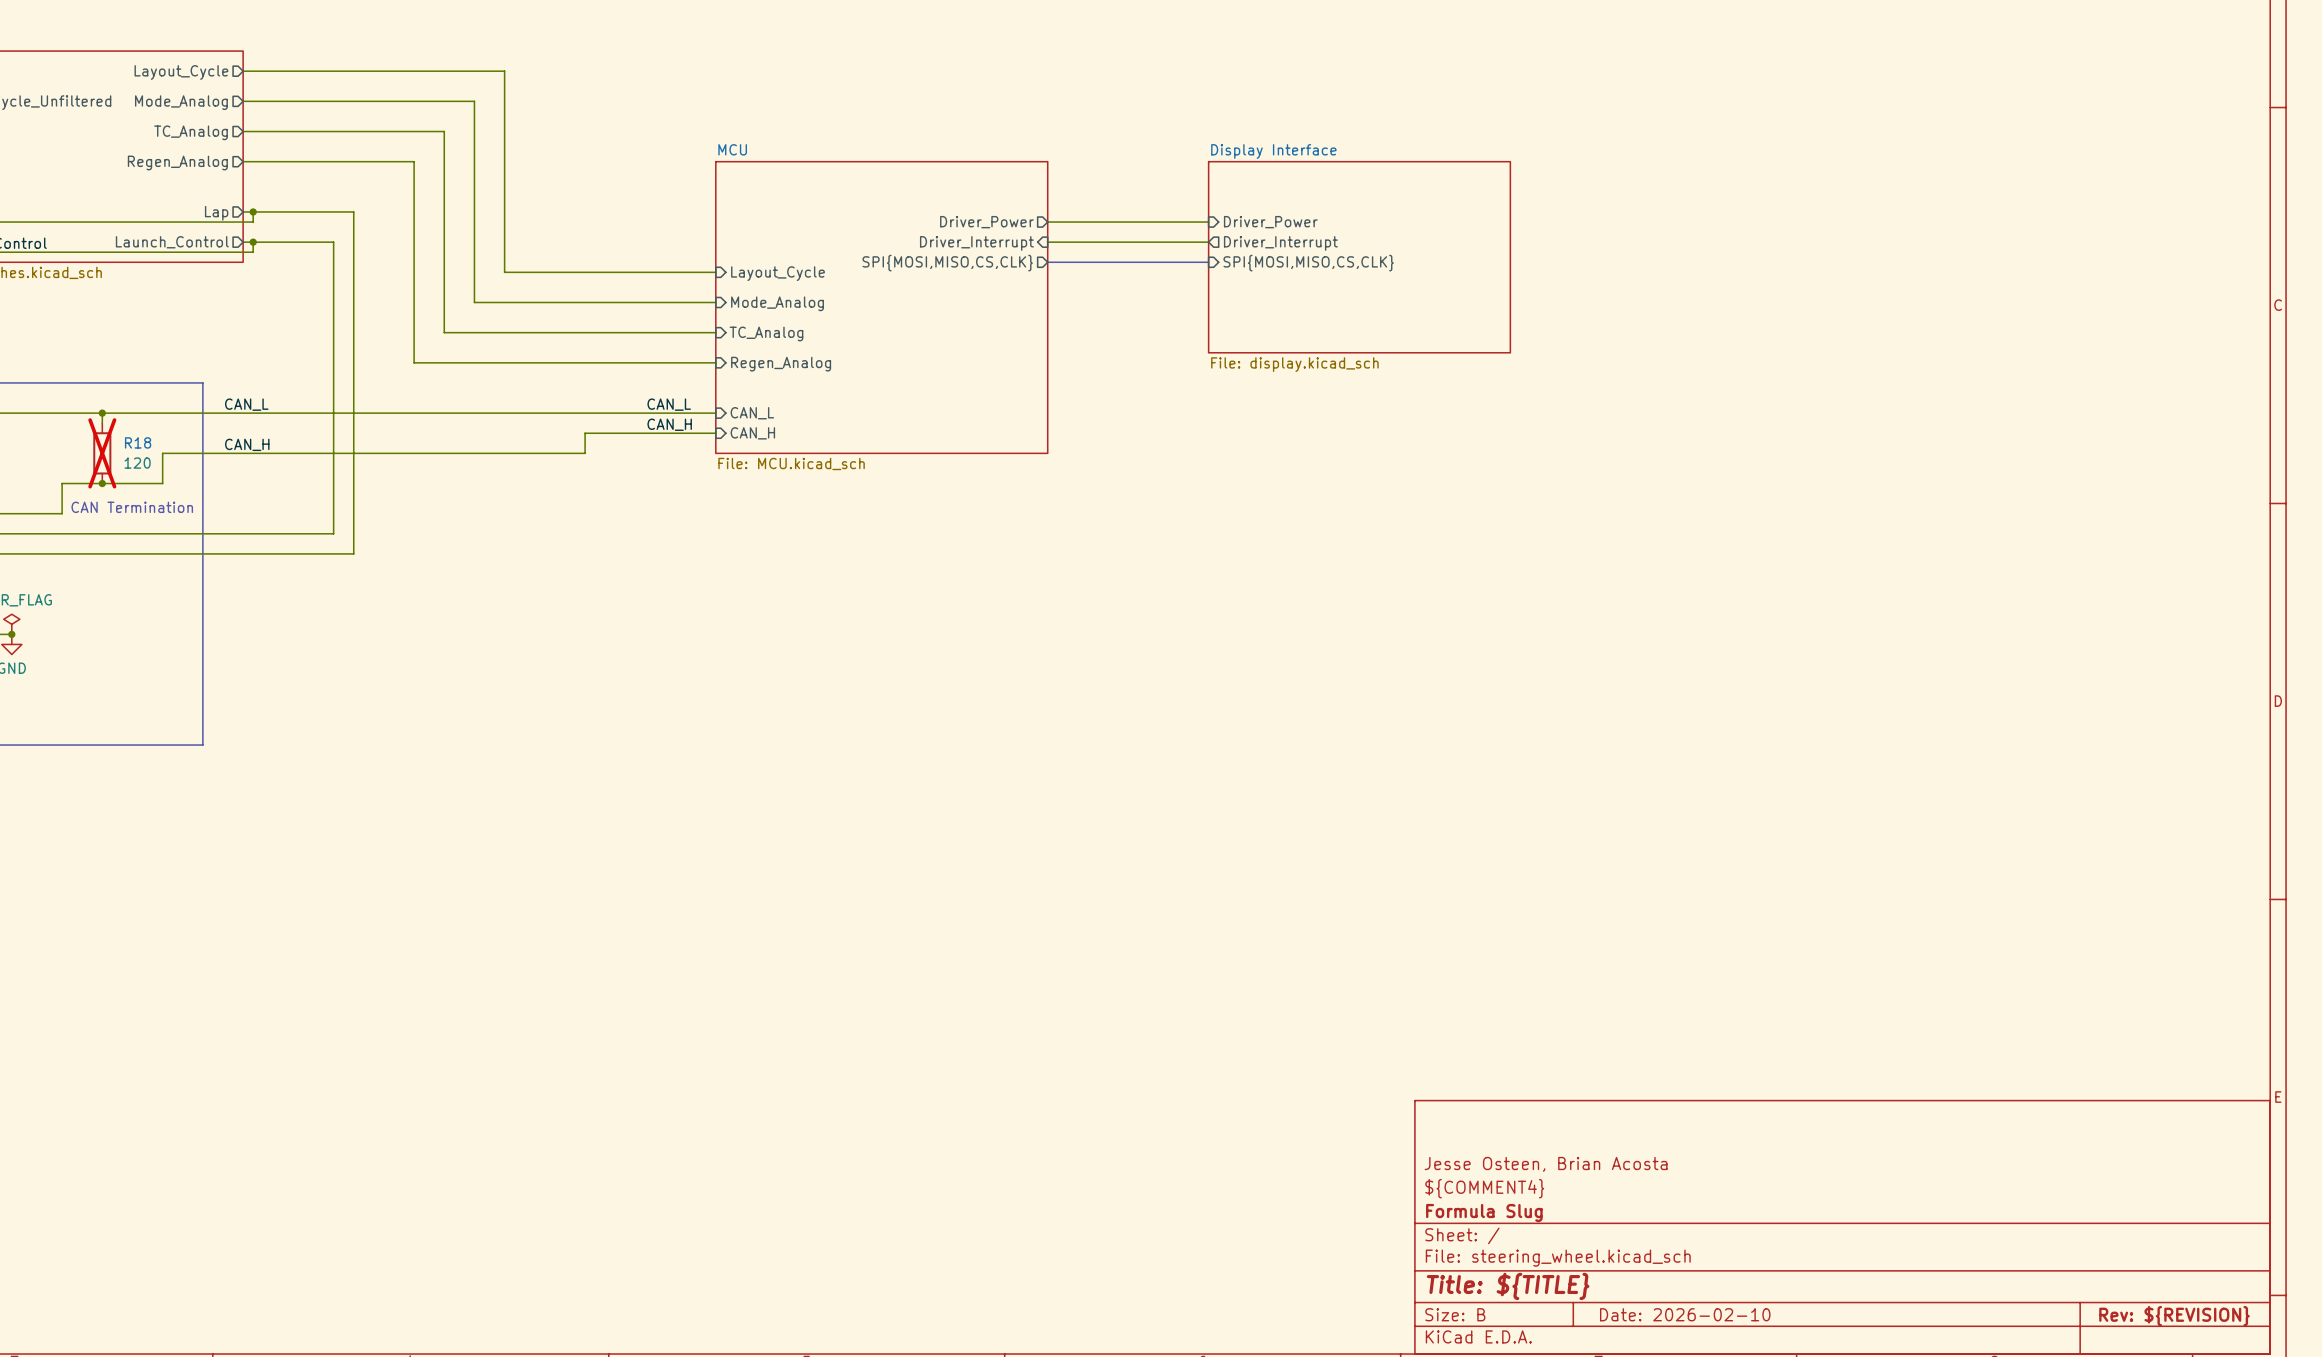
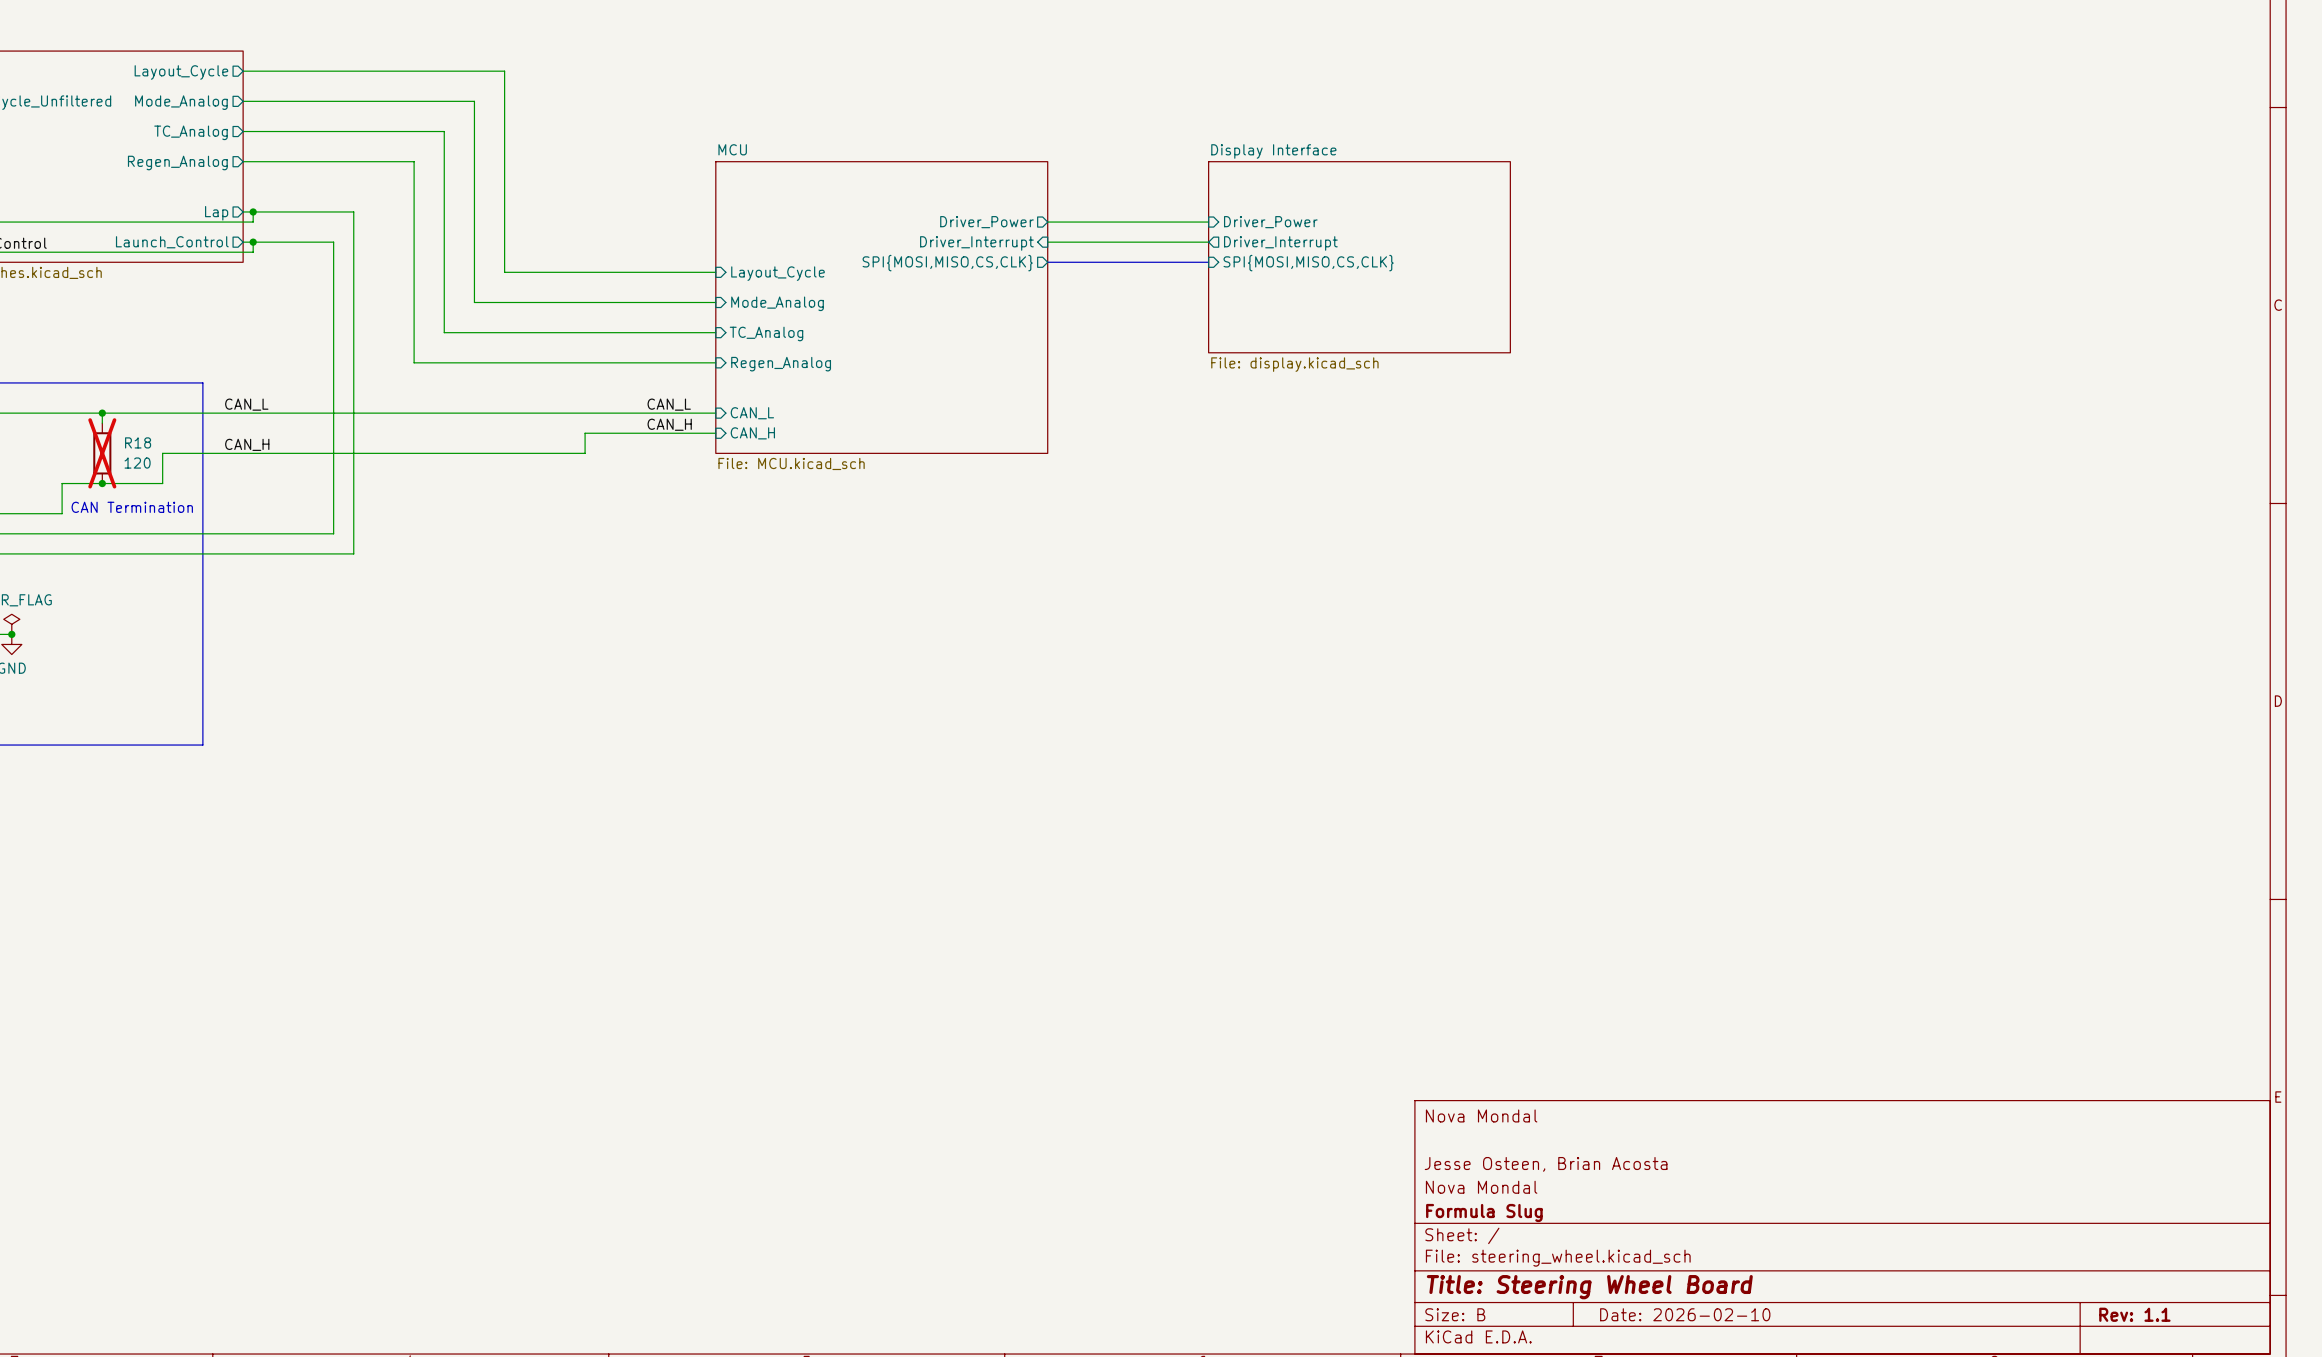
title block: none -> Nova Mondal (1481, 1115)
title block: ${COMMENT4} (1484, 1188) -> Nova Mondal (1481, 1187)
title block: Title: ${TITLE} (1508, 1286) -> Title: Steering Wheel Board (1589, 1287)
title block: Rev: ${REVISION} (2174, 1316) -> Rev: 1.1 (2134, 1314)

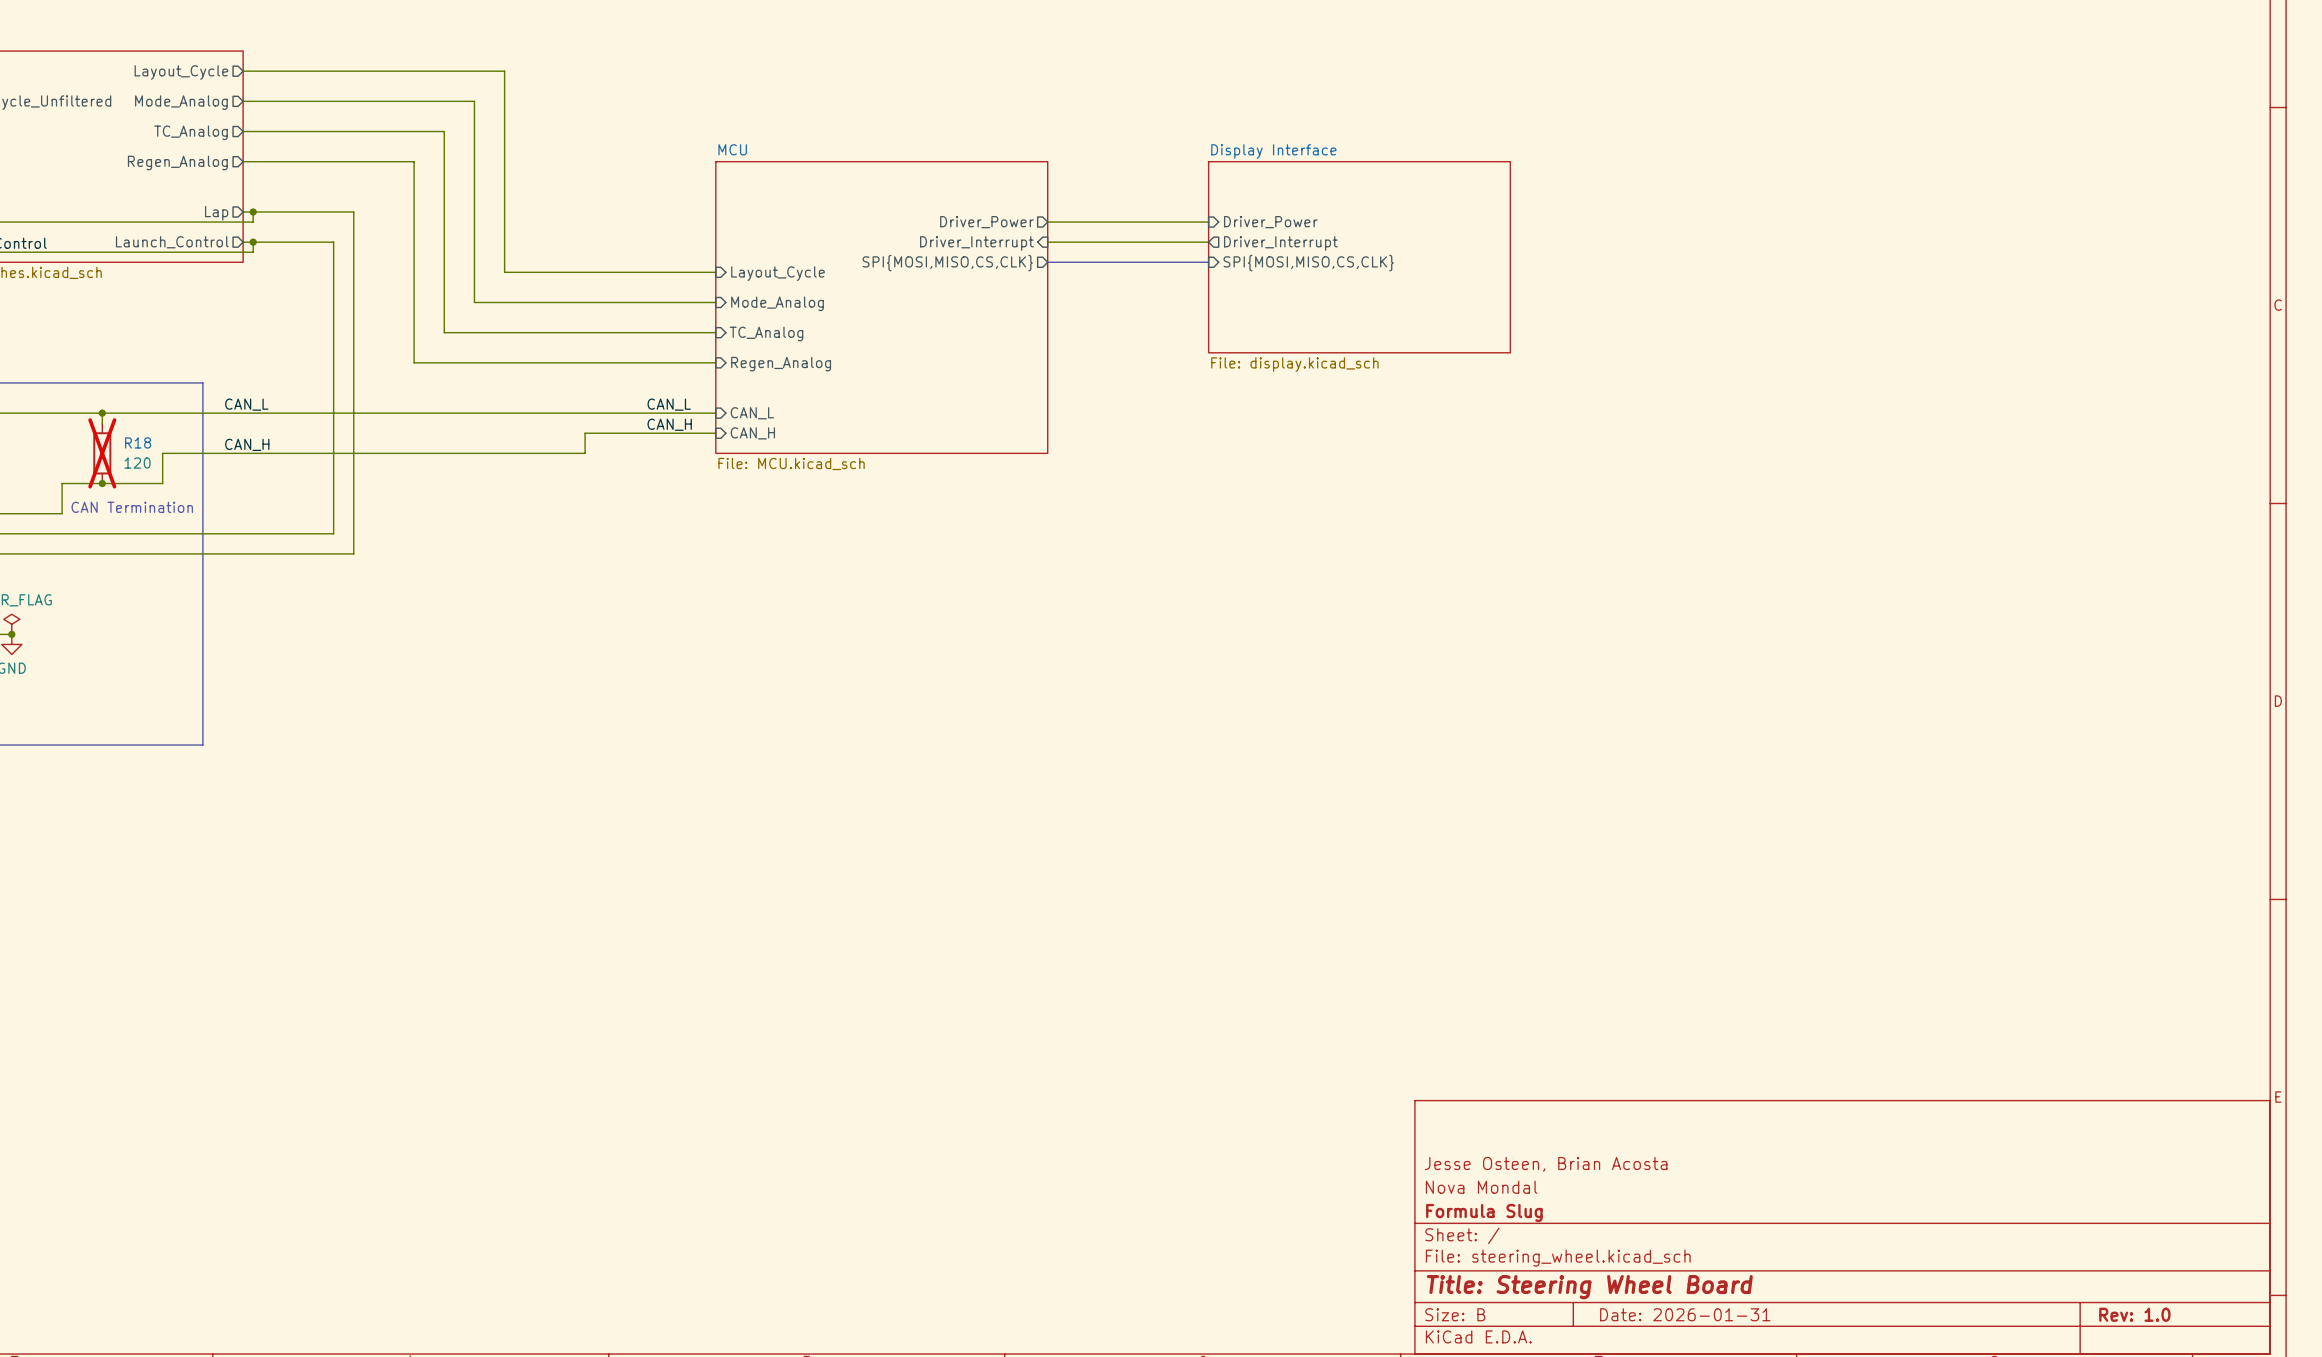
title block: Nova Mondal (1481, 1115) -> none
title block: Date: 2026-02-10 (1685, 1314) -> Date: 2026-01-31 (1685, 1314)
title block: Rev: 1.1 (2134, 1314) -> Rev: 1.0 (2134, 1314)

